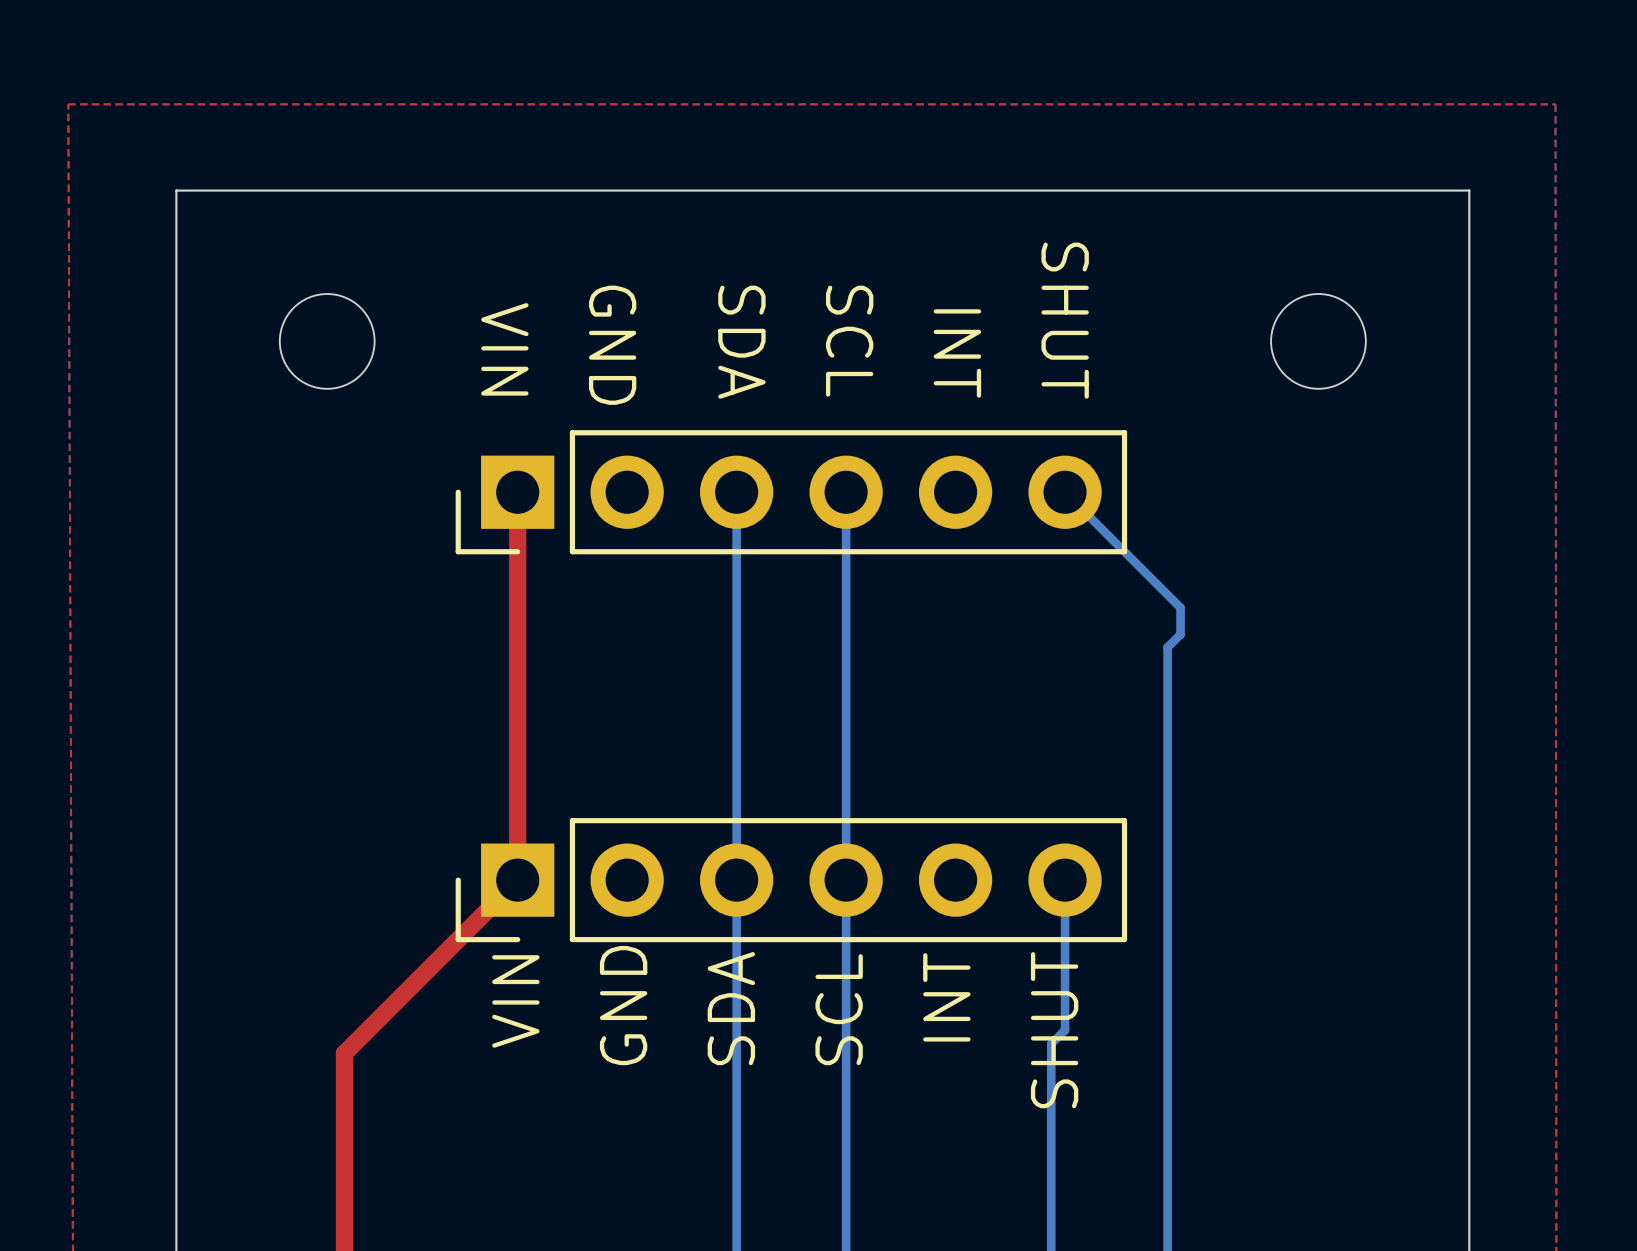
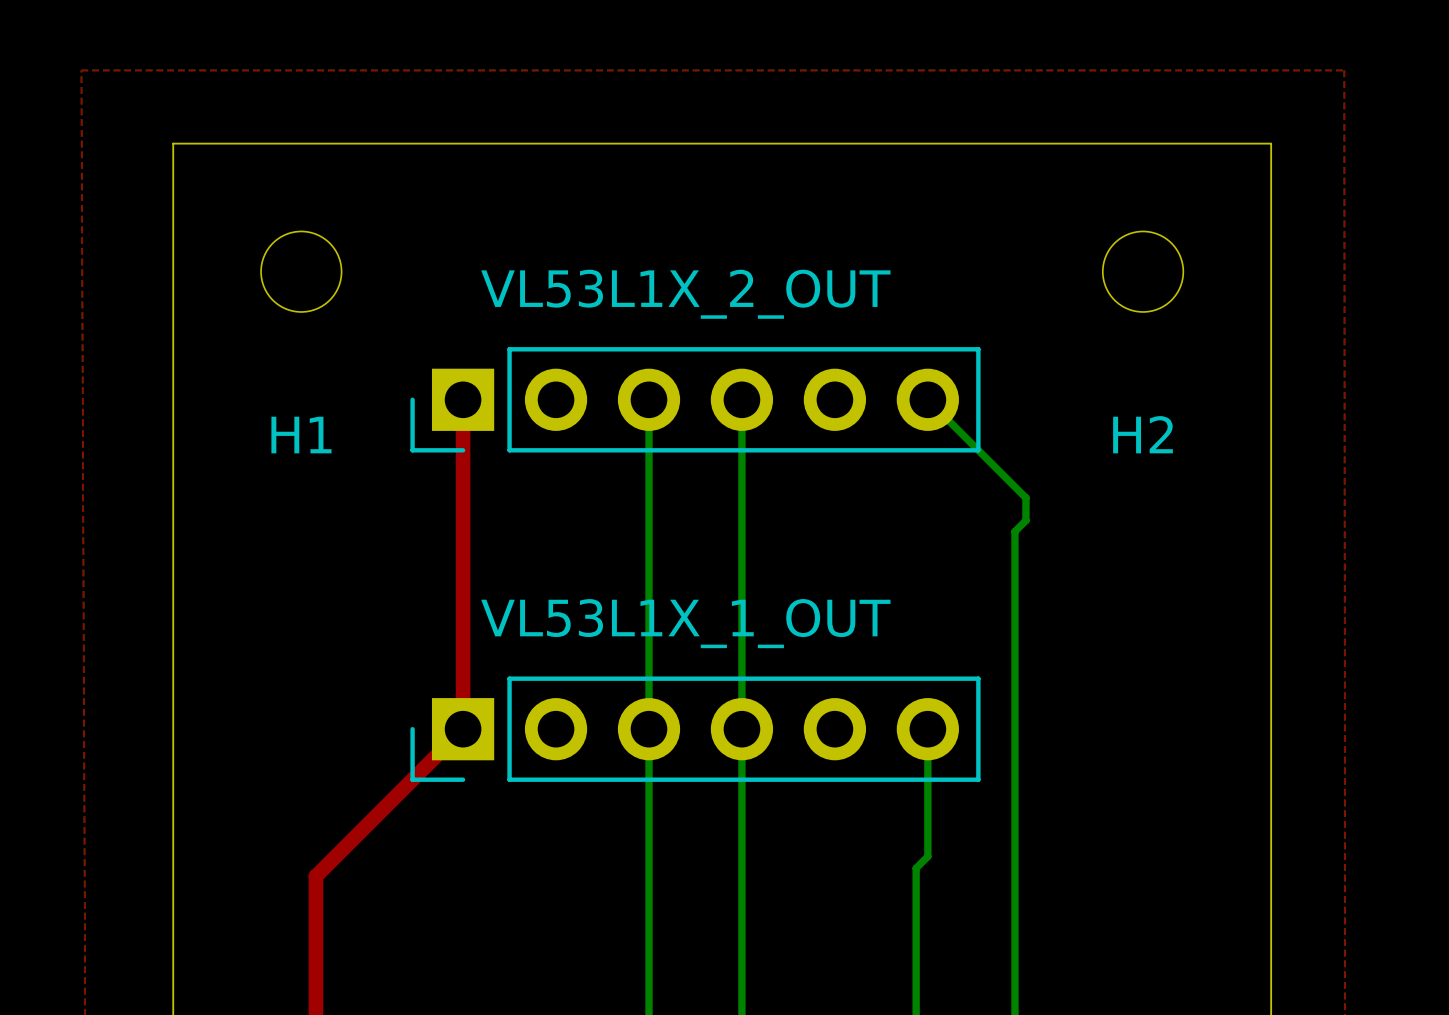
text: SHUT (1065, 320) -> none
text: SCL (849, 341) -> none
text: SDA (741, 342) -> none
text: GND (612, 345) -> none
text: VIN (504, 349) -> none
text: INT (957, 353) -> none
VL53L1X_2_OUT name: none -> VL53L1X_2_OUT (685, 294)
H1 name: none -> H1 (301, 435)
H2 name: none -> H2 (1143, 434)
VL53L1X_1_OUT name: none -> VL53L1X_1_OUT (685, 623)
text: INT (946, 997) -> none
text: VIN (515, 1001) -> none
text: GND (623, 1005) -> none
text: SDA (731, 1008) -> none
text: SCL (839, 1009) -> none
text: SHUT (1054, 1030) -> none

